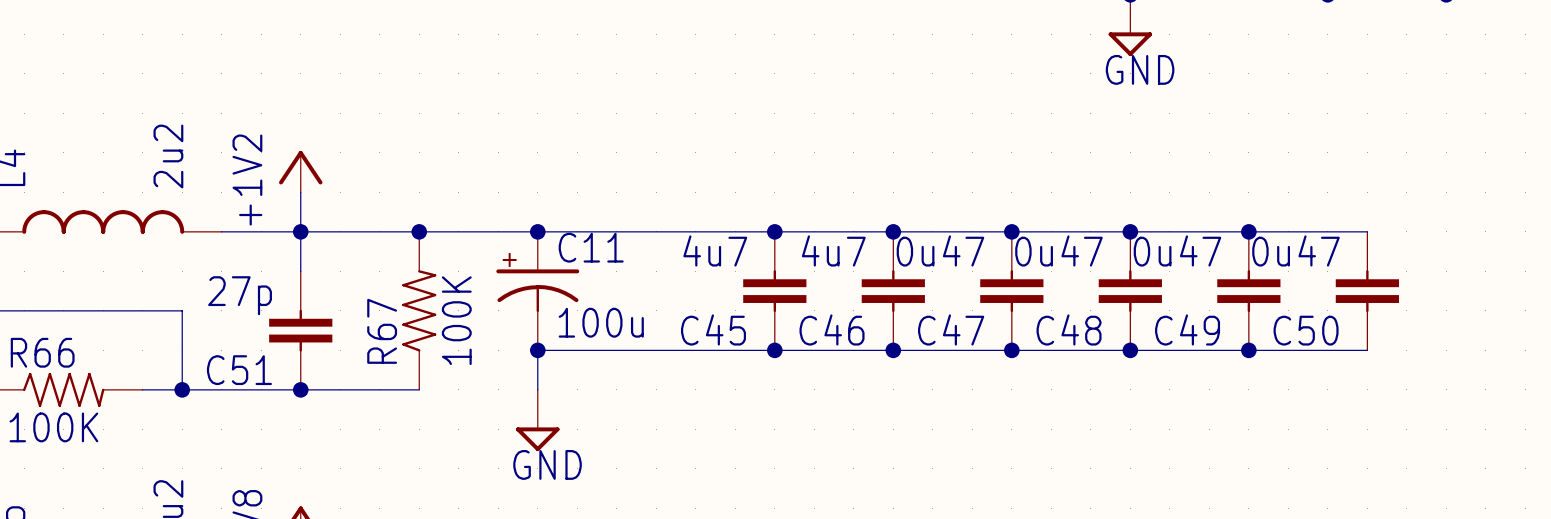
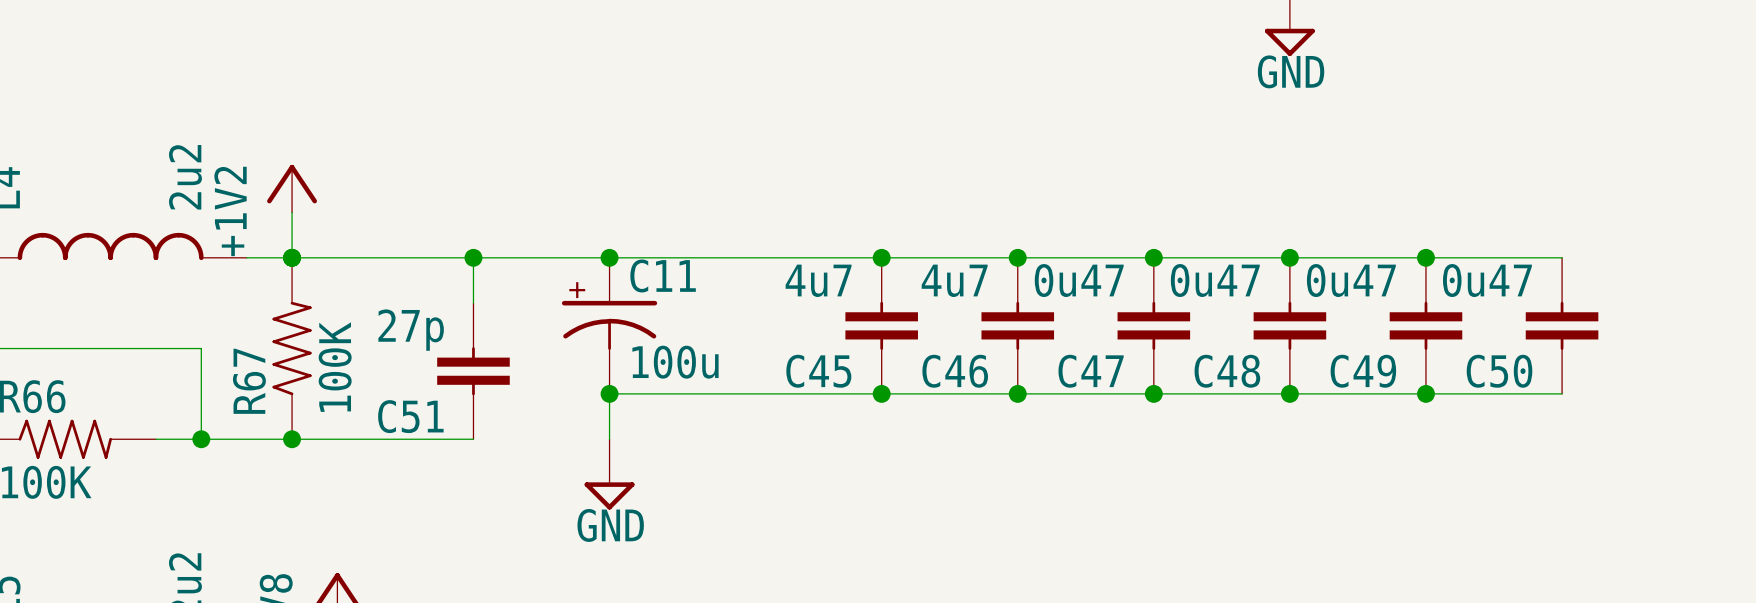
power symbol position: +1V2 (300, 171) -> +1V2 (292, 188)
wire: none -> (292, 212) (292, 257)
wire: (300, 192) (300, 271) -> none
junction position: (300, 231) -> (292, 257)
R67 position: (419, 310) -> (292, 348)
C51 position: (300, 330) -> (473, 371)
junction position: (300, 389) -> (292, 439)

